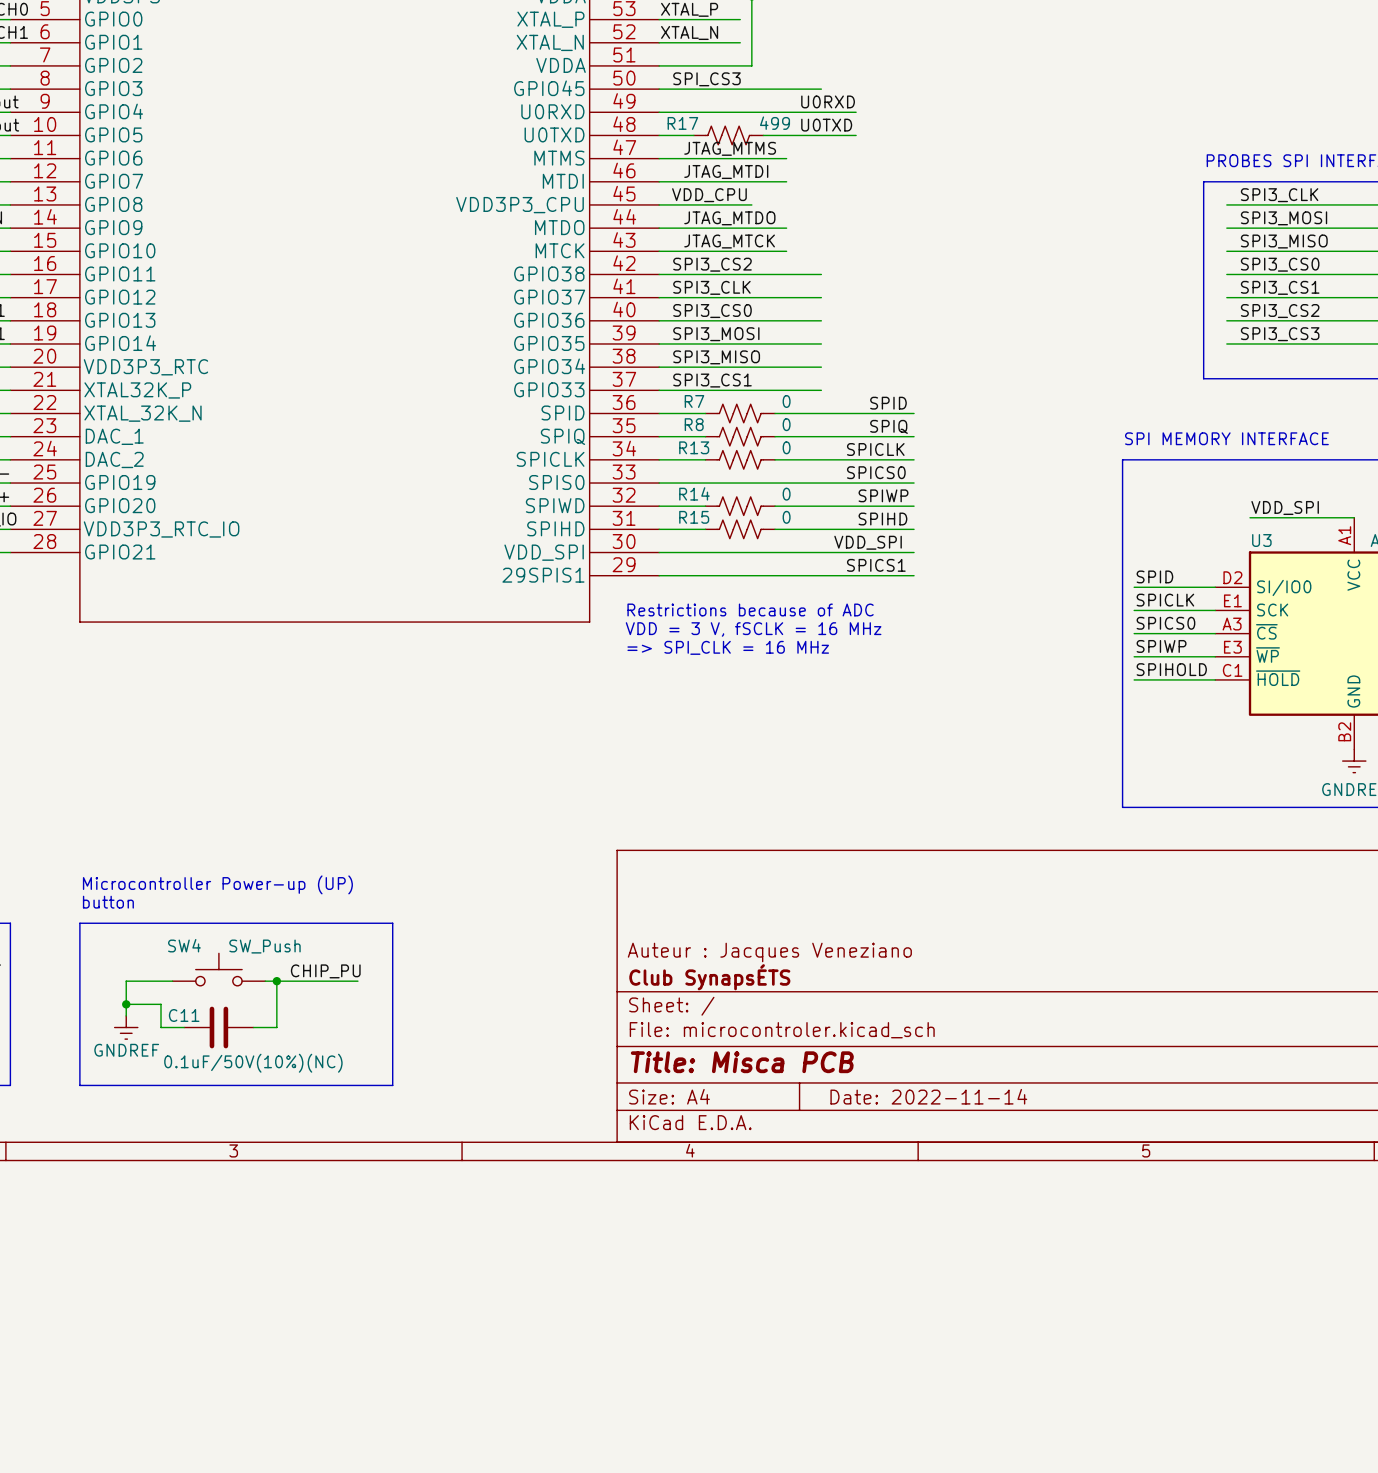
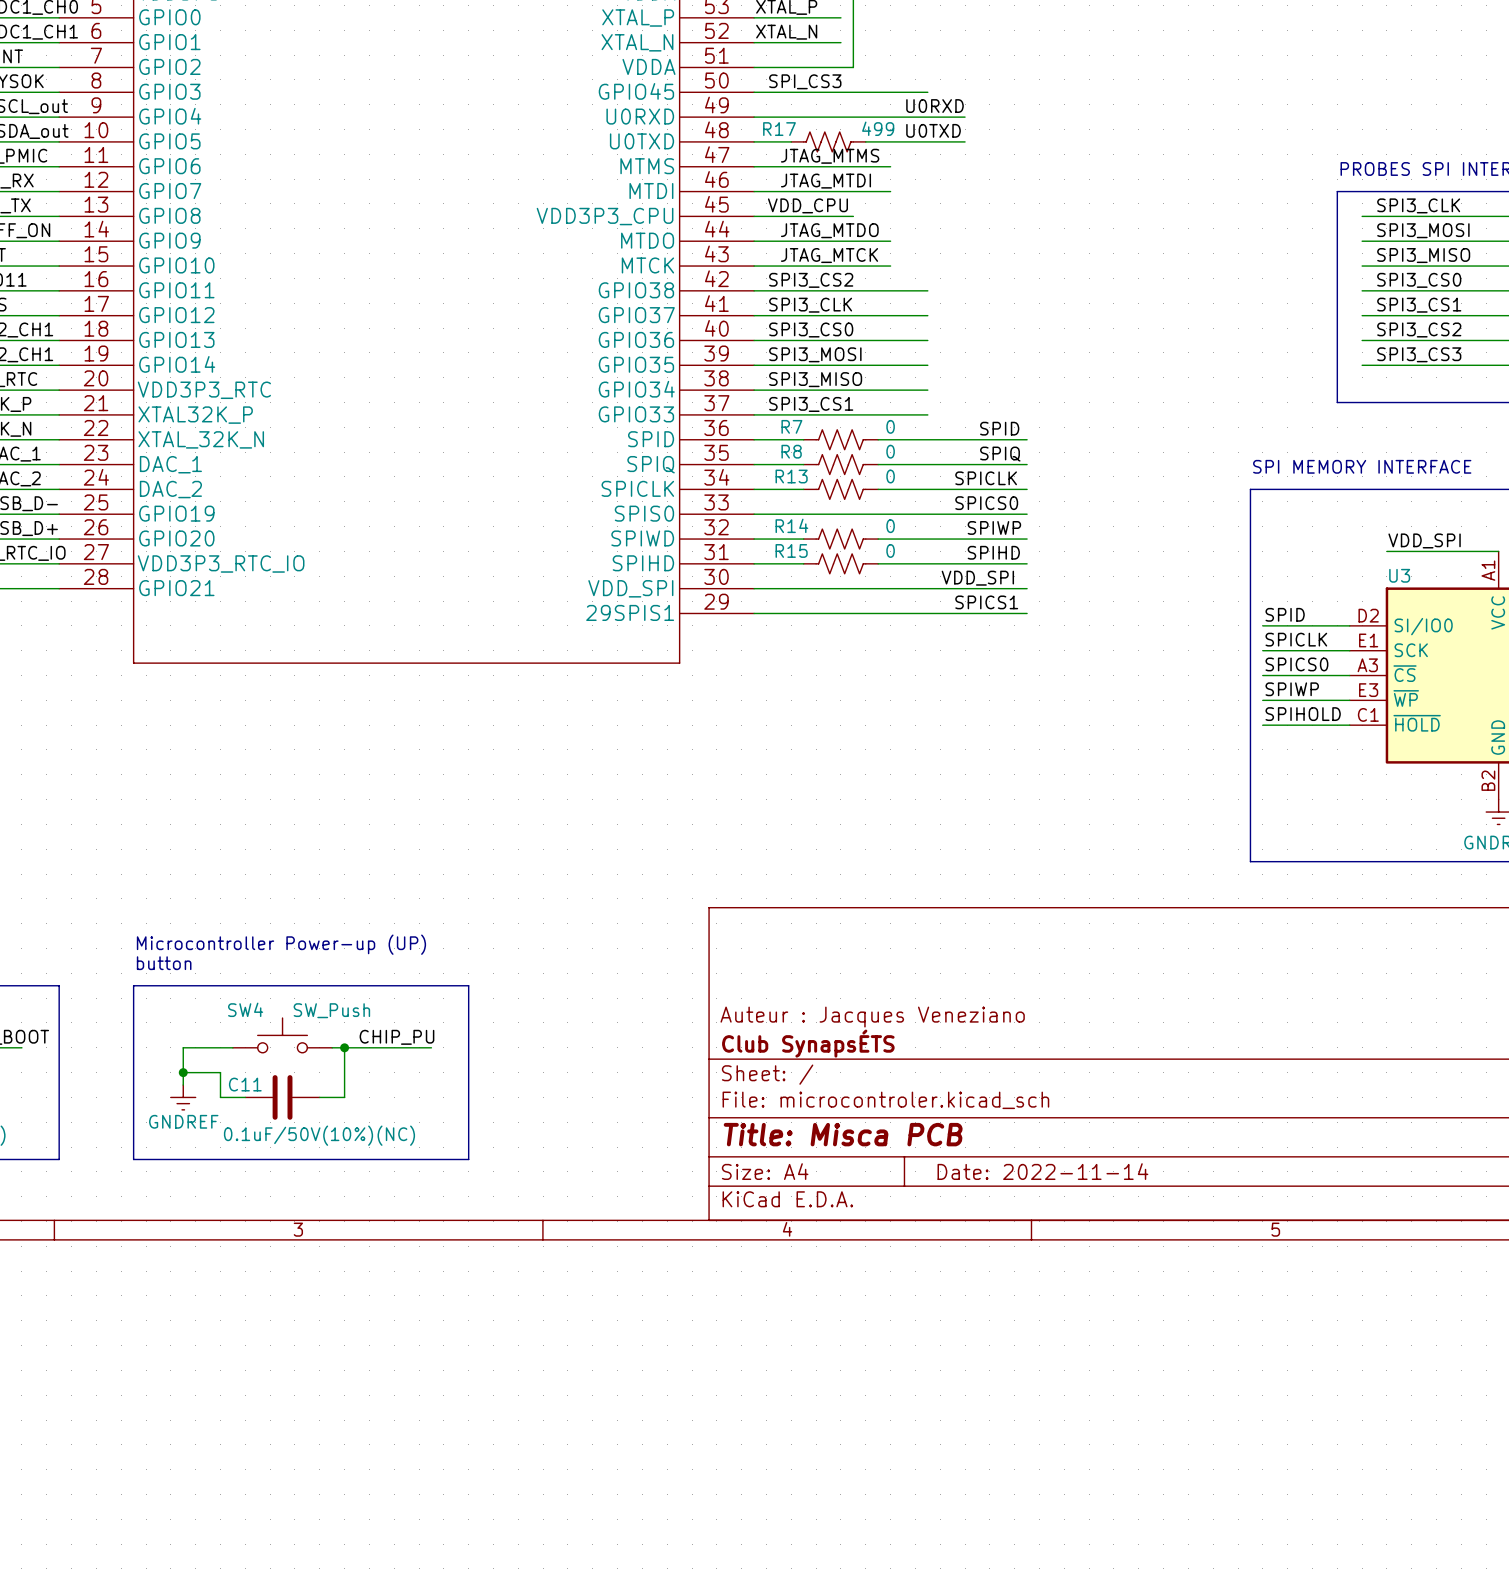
text: Restrictions because of ADC (750, 609) -> none
text: VDD = 3 V, fSCLK = 16 MHz (753, 629) -> none
text: => SPI_CLK = 16 MHz (728, 647) -> none

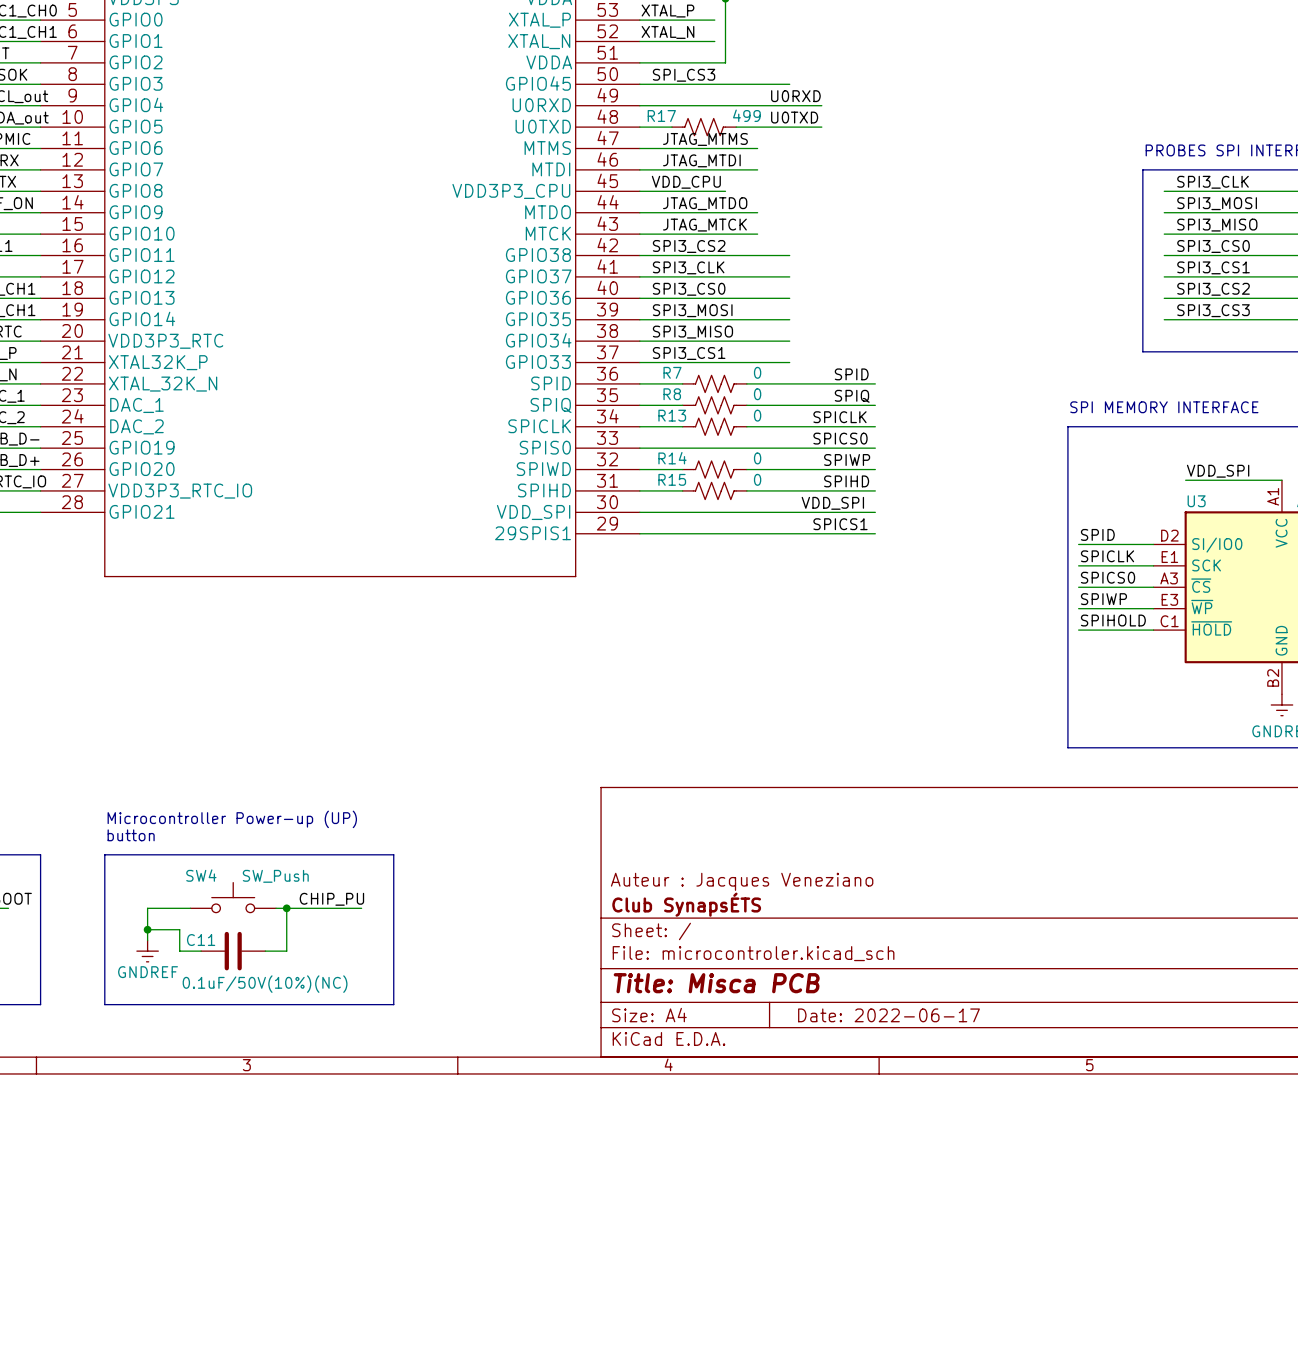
title block: Date: 2022-11-14 (1042, 1171) -> Date: 2022-06-17 (888, 1015)

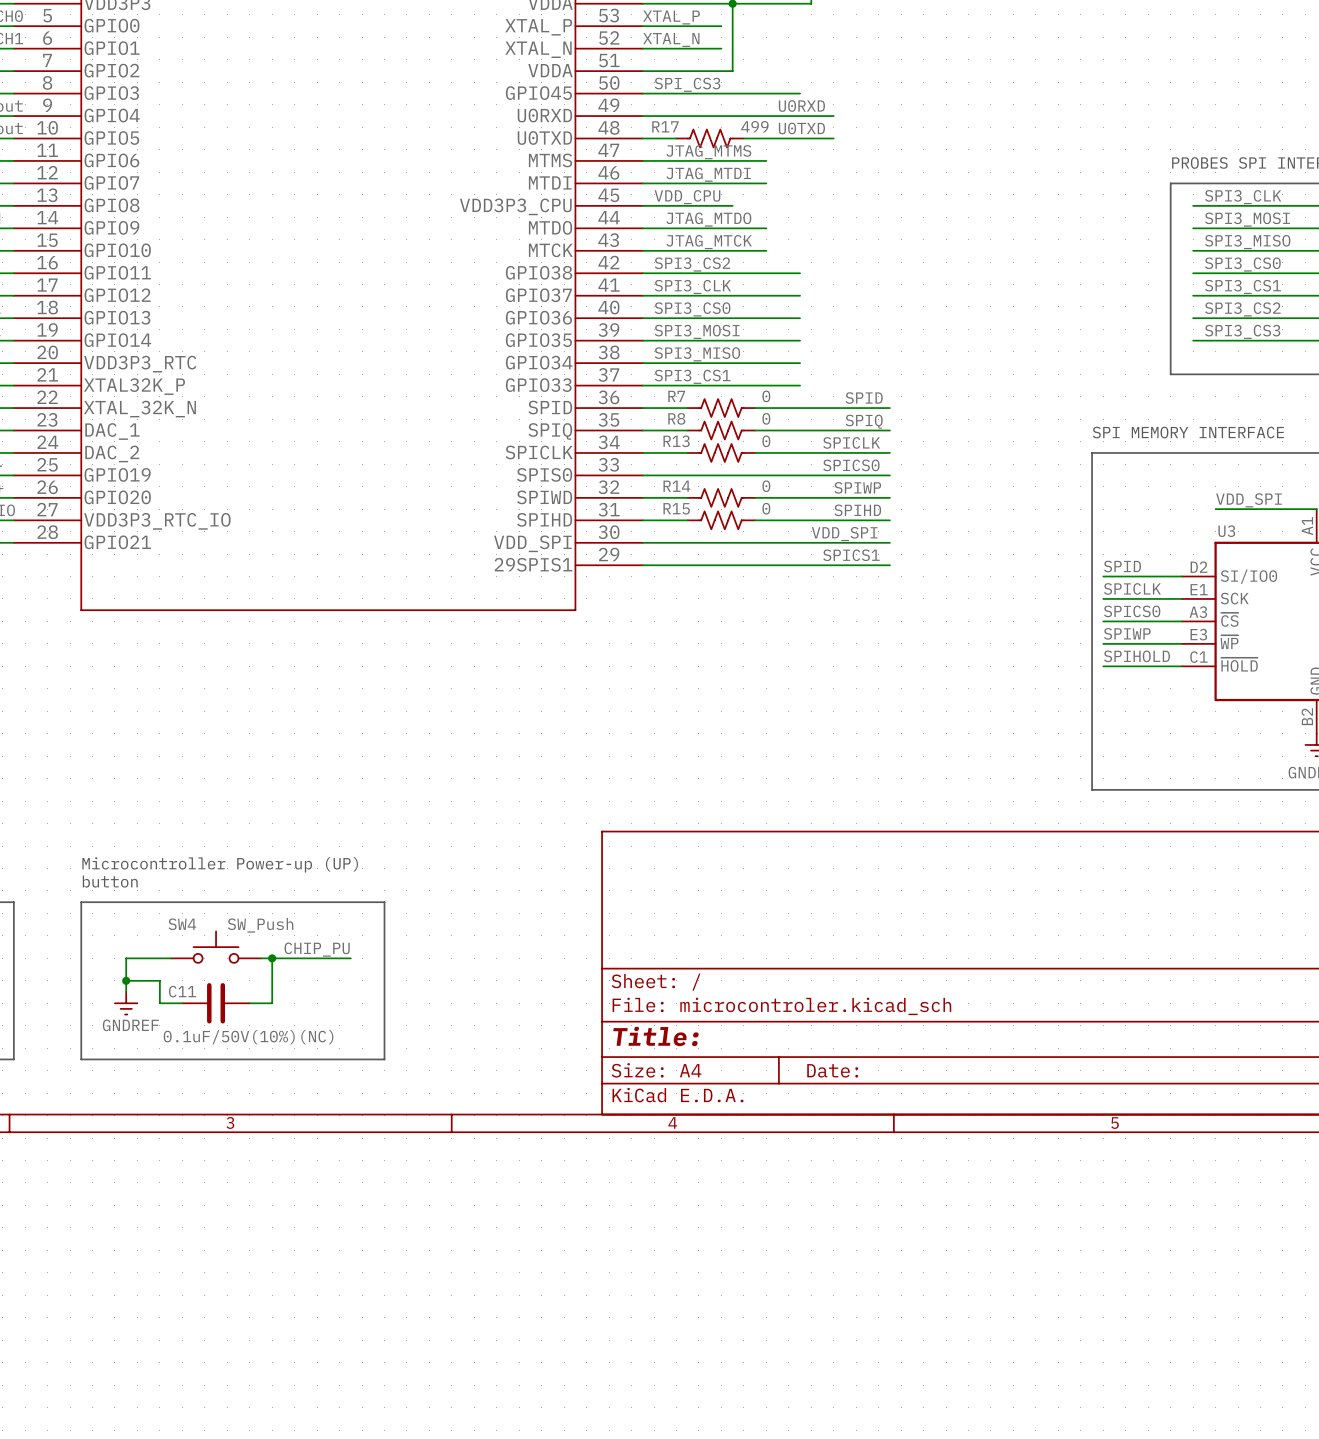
title block: Auteur : Jacques Veneziano (742, 881) -> none
title block: Club SynapsÉTS (686, 904) -> none
title block: Title: Misca PCB (716, 983) -> Title: (656, 1036)
title block: Date: 2022-06-17 (888, 1015) -> Date: (832, 1070)

